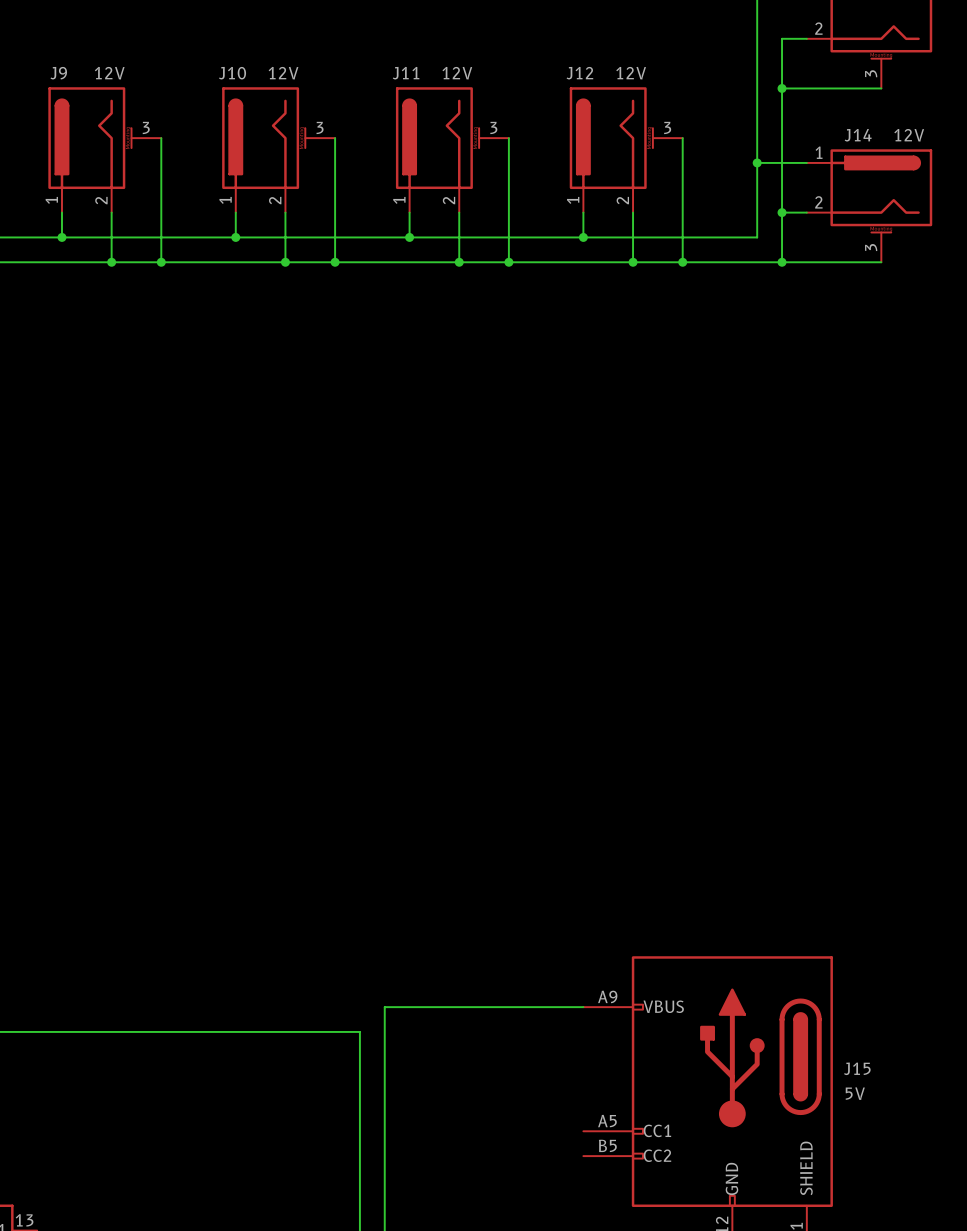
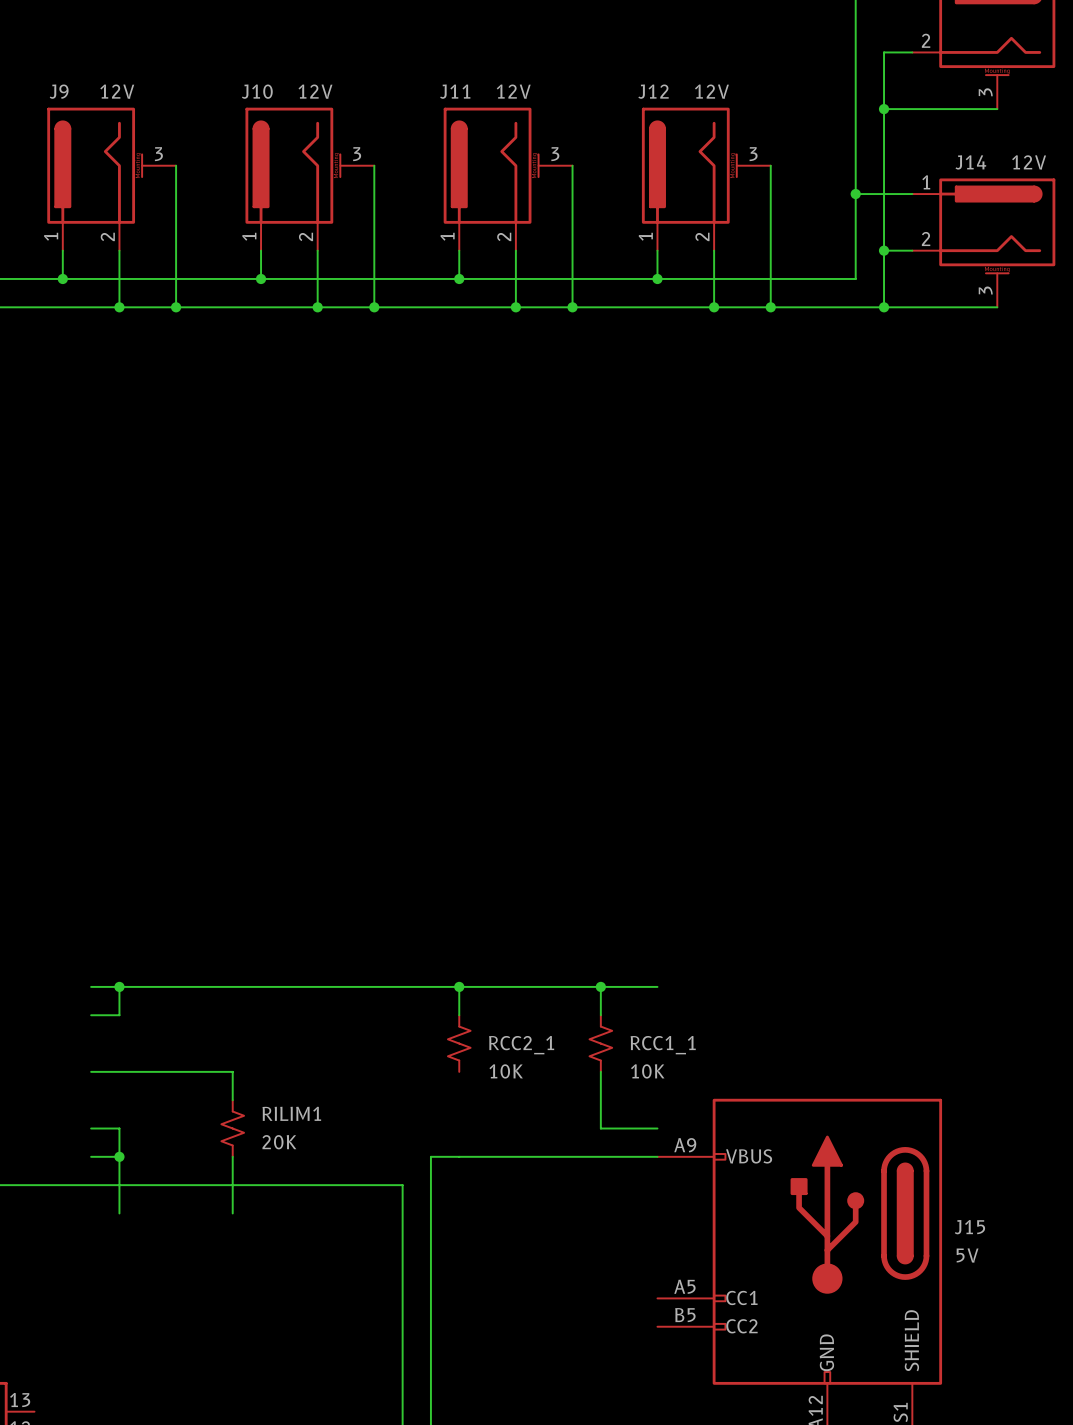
wire: none -> (91, 986) (657, 986)
wire: none -> (119, 986) (119, 1015) (91, 1015)
junction: none -> (119, 986)
wire: none -> (459, 986) (459, 1015)
junction: none -> (459, 986)
wire: none -> (600, 986) (600, 1015)
junction: none -> (600, 986)
RCC2_1: none -> 10K (459, 1043)
RCC1_1: none -> 10K (600, 1043)
wire: none -> (91, 1071) (232, 1071) (232, 1100)
wire: none -> (600, 1071) (600, 1128) (657, 1128)
wire: none -> (91, 1128) (119, 1128) (119, 1213)
RILIM1: none -> 20K (232, 1128)
wire: none -> (91, 1156) (119, 1156)
junction: none -> (119, 1156)
wire: none -> (232, 1156) (232, 1213)

